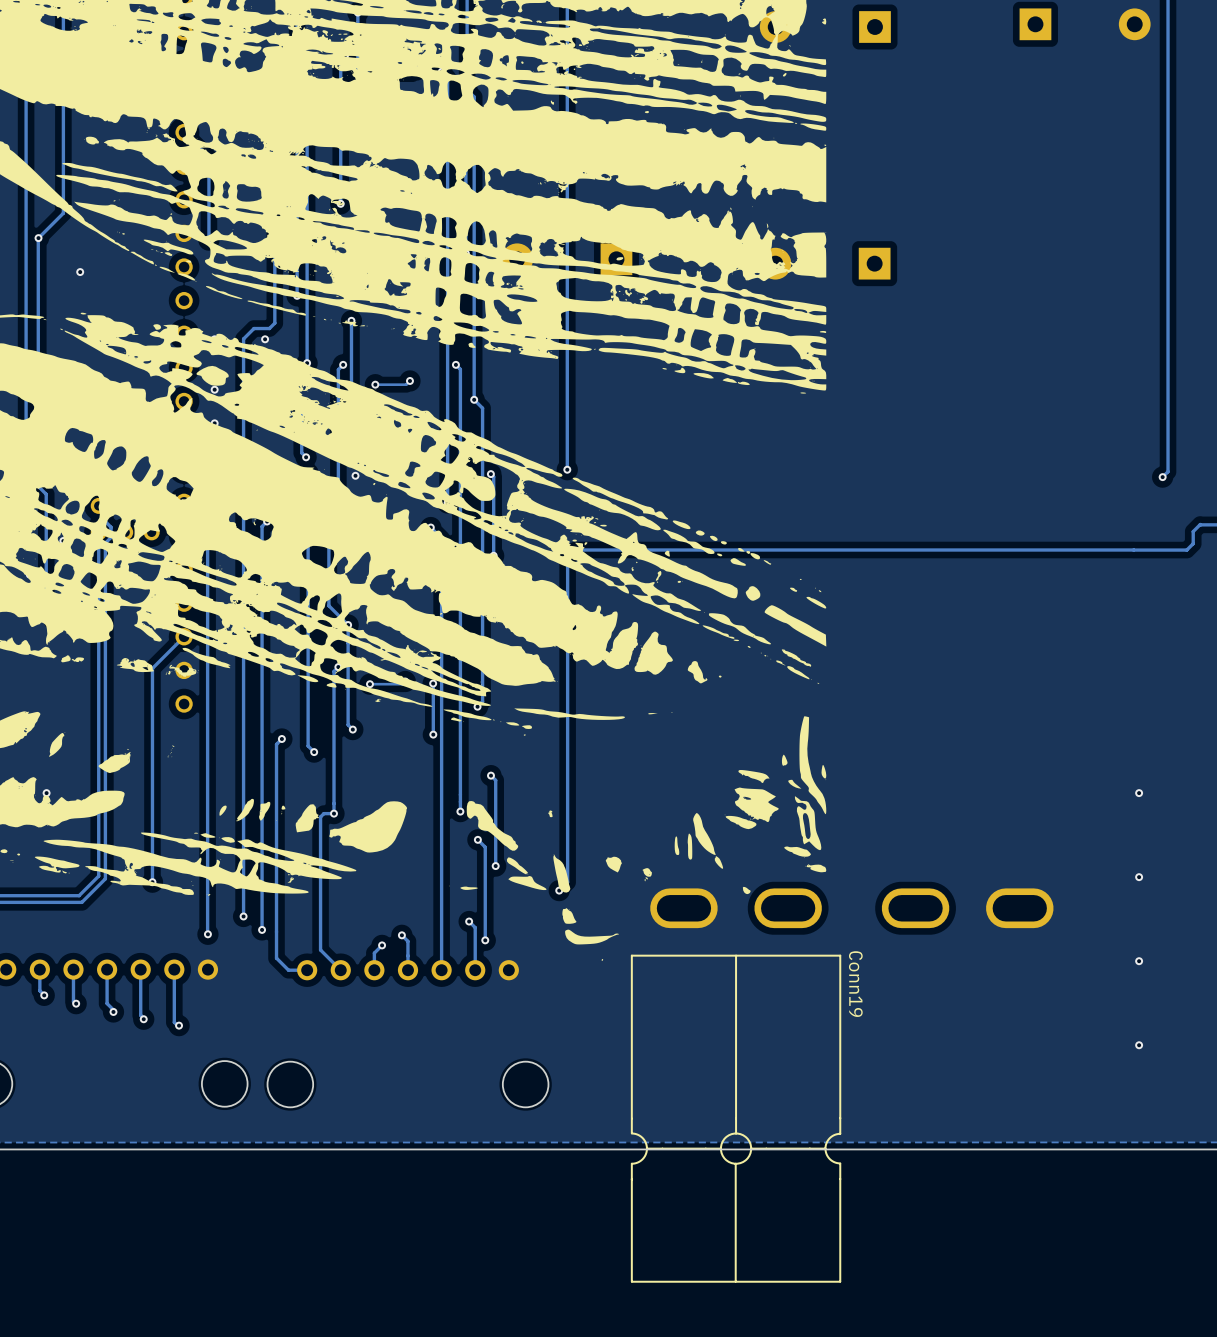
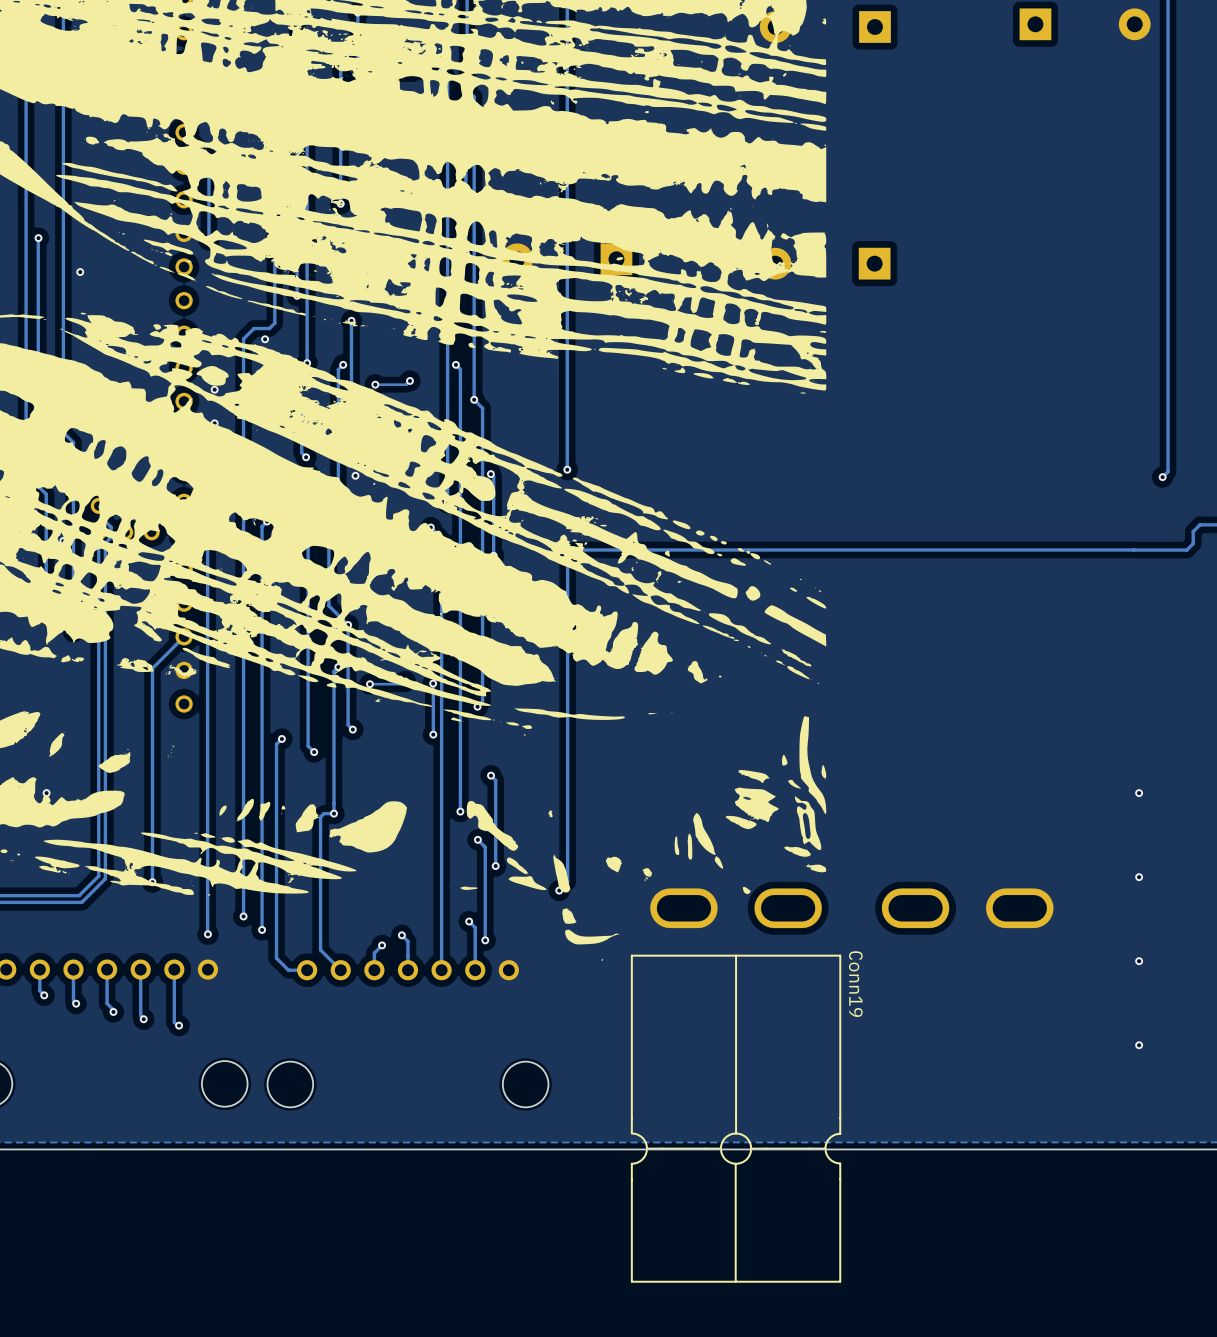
track: (63, 213) (38, 238) -> (63, 213) (63, 432) (73, 442) (73, 631)

